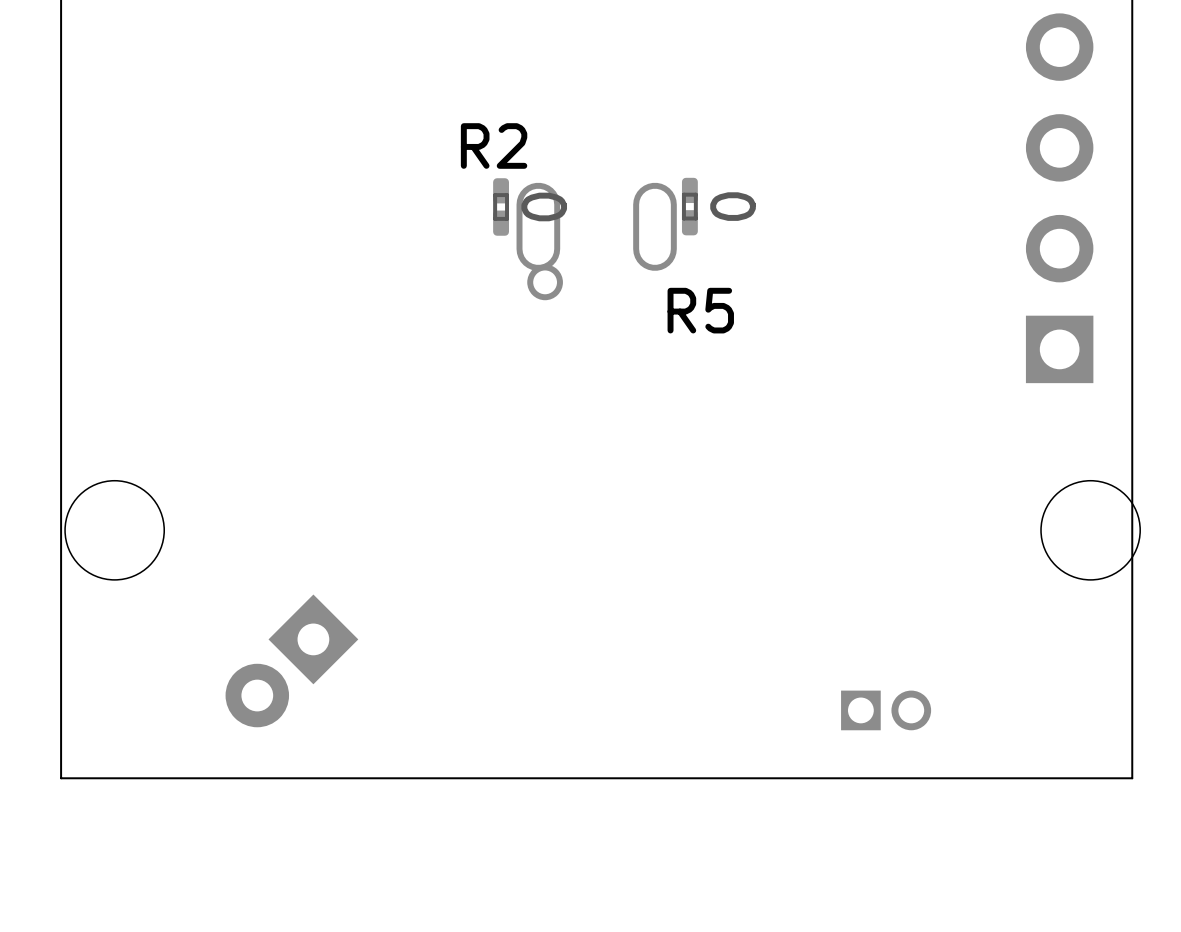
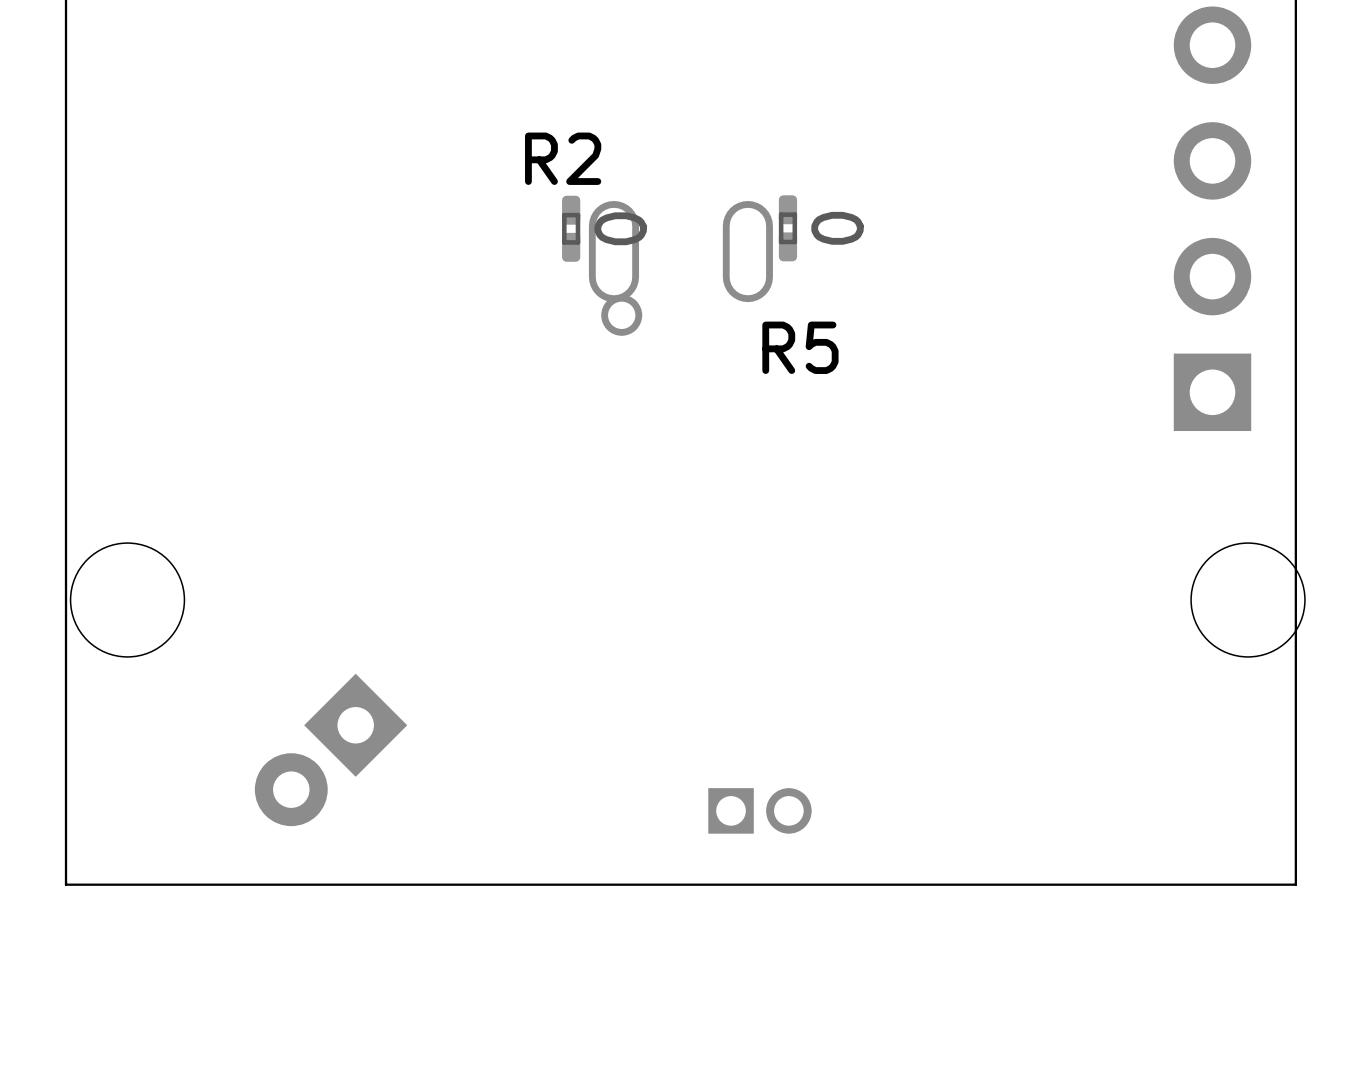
part position: (886, 710) -> (759, 810)

